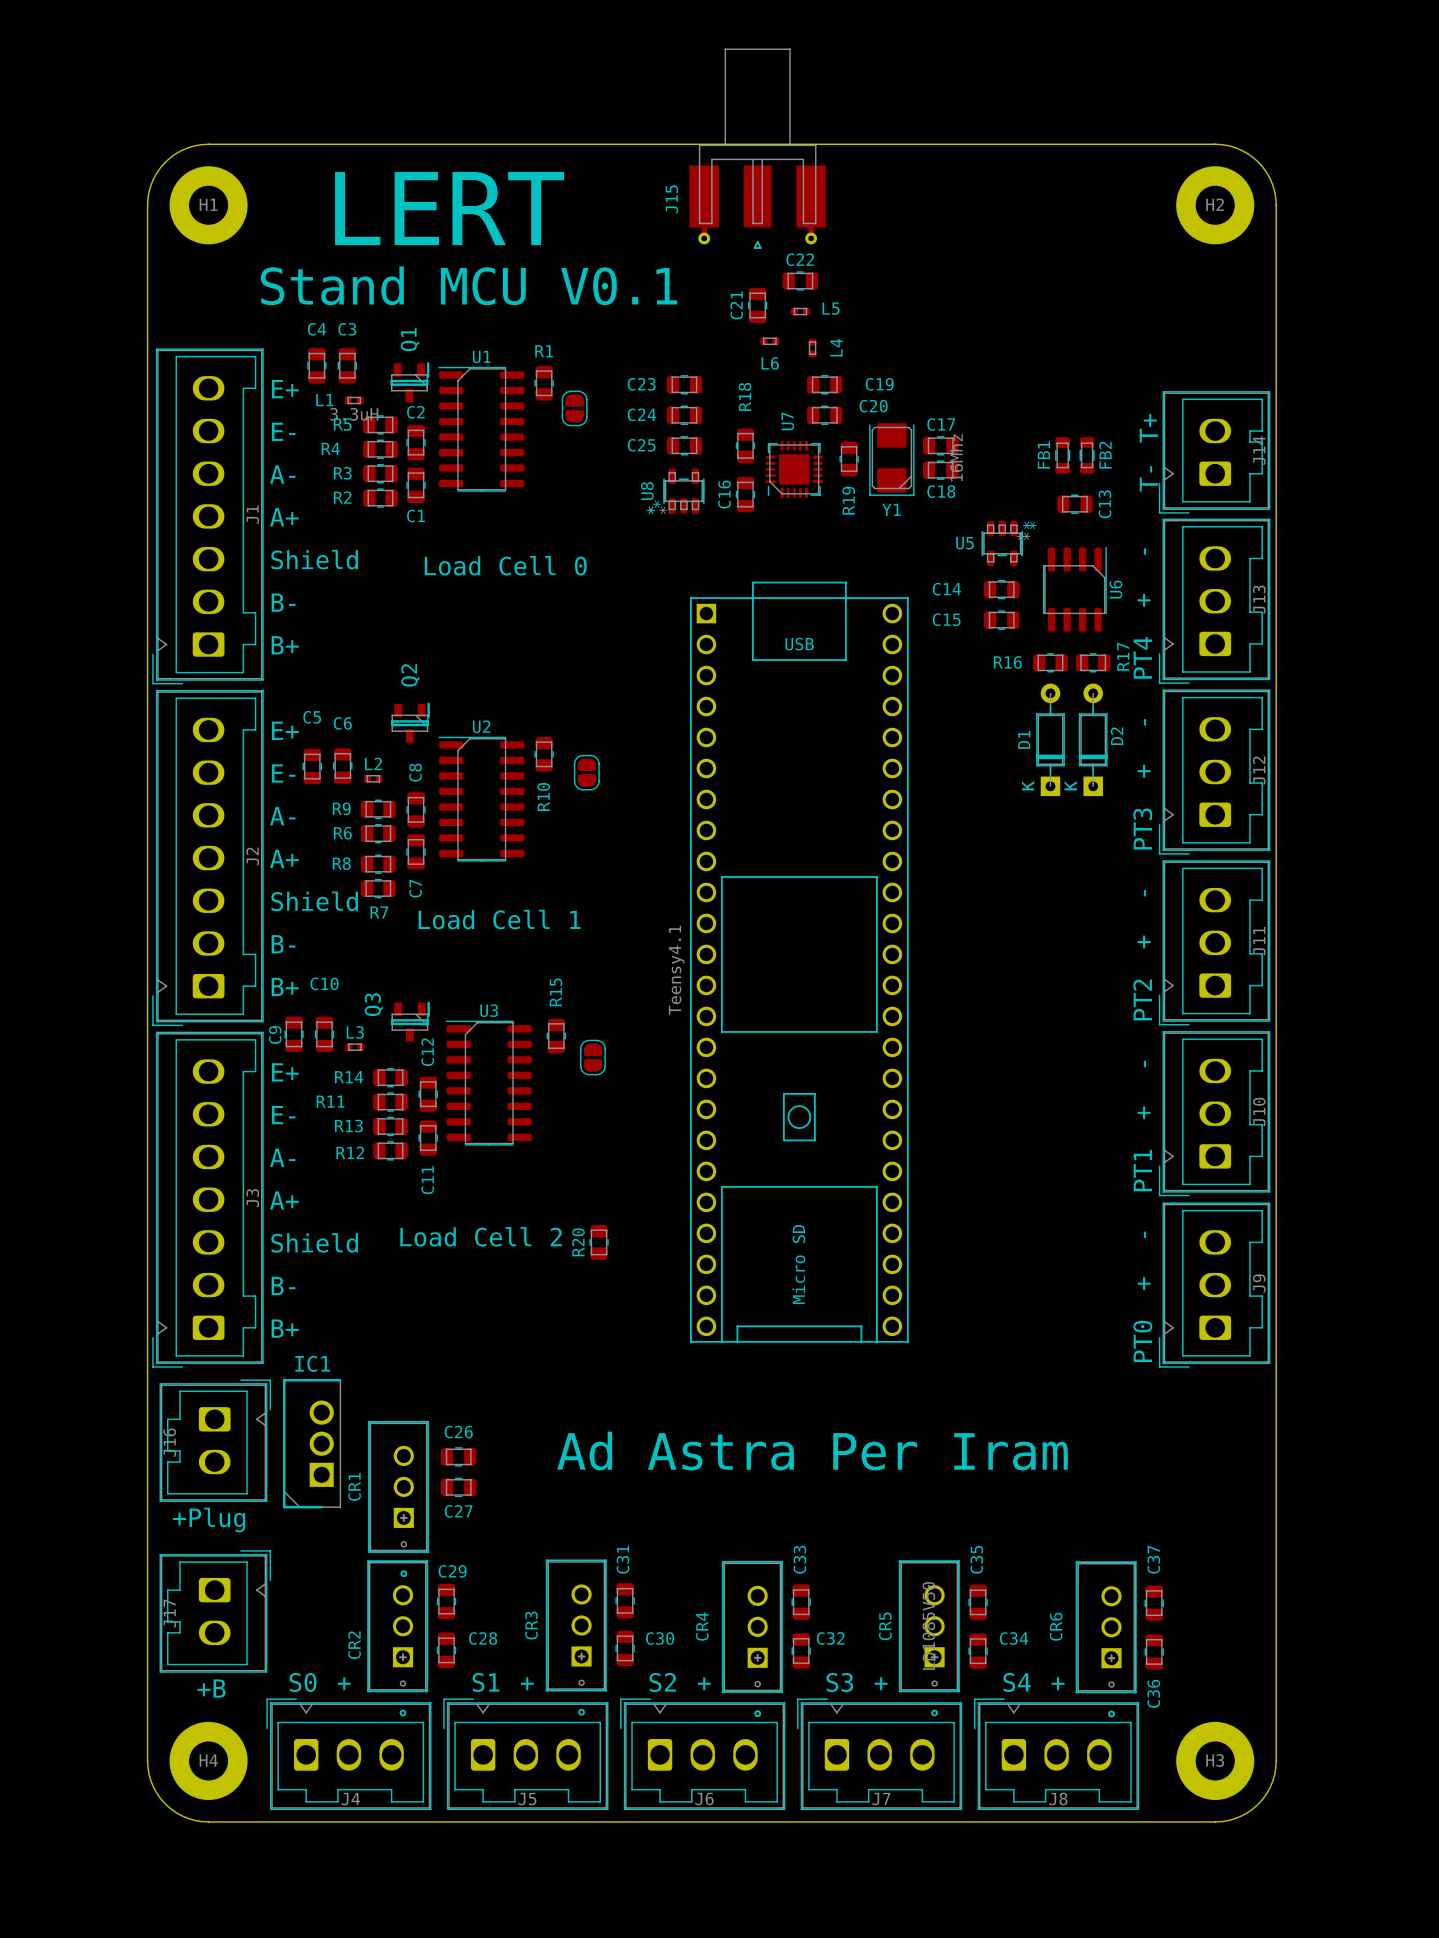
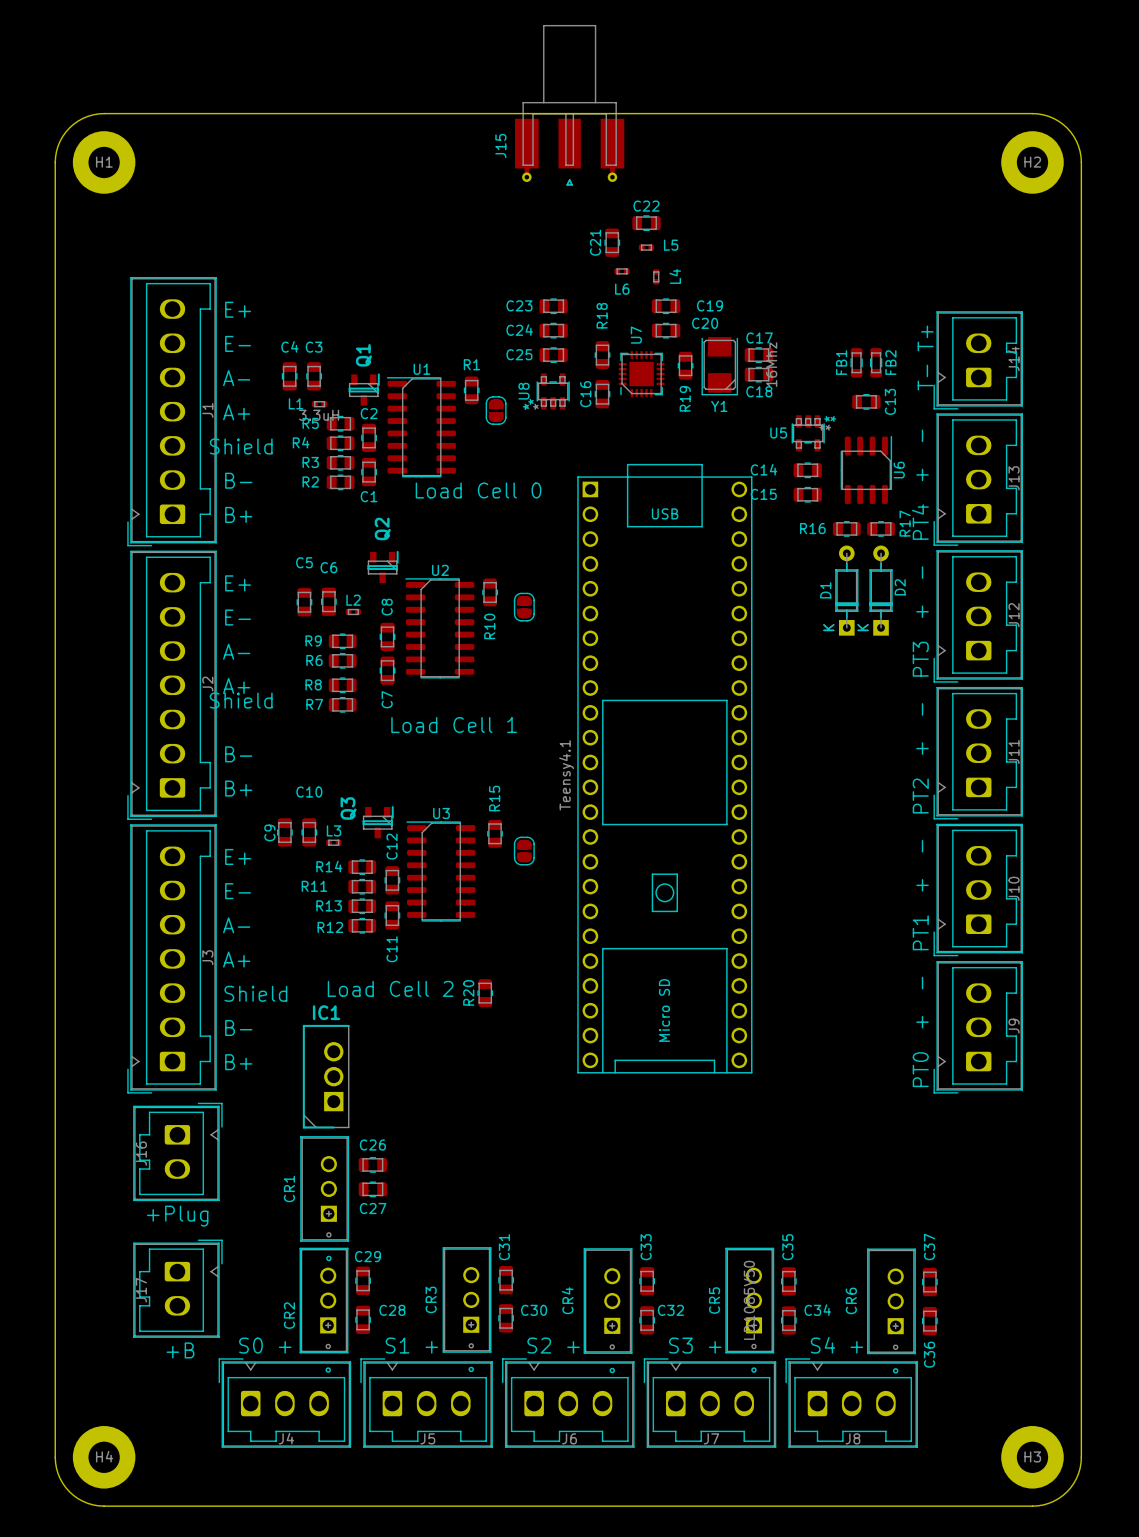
board edge: (208, 144) (195, 145) (182, 150) (165, 162) (156, 172) (151, 185) (147, 205) (147, 1760) (149, 1774) (153, 1787) (165, 1804) (182, 1815) (195, 1820) (208, 1821) (1215, 1821) (1228, 1820) (1241, 1815) (1253, 1808) (1266, 1793) (1272, 1781) (1276, 1760) (1276, 205) (1274, 191) (1270, 178) (1258, 162) (1247, 153) (1235, 147) (1215, 144) -> (172, 113) (104, 113) (82, 118) (73, 124) (62, 136) (58, 146) (55, 162) (55, 1457) (58, 1473) (69, 1491) (87, 1503) (104, 1506) (1032, 1506) (1048, 1503) (1058, 1498) (1073, 1483) (1080, 1468) (1081, 1457) (1081, 157) (1078, 146) (1070, 132) (1053, 118) (1037, 113) (978, 113)
J15 position: (757, 148) -> (569, 105)
H1 position: (208, 205) -> (104, 162)
H2 position: (1215, 205) -> (1032, 162)
text: LERT (449, 208) -> none
text: Stand MCU V0.1 (468, 285) -> none
C4 position: (316, 365) -> (289, 376)
C3 position: (347, 365) -> (314, 376)
Q1 position: (409, 382) -> (364, 389)
R1 position: (544, 383) -> (471, 390)
L1 position: (354, 400) -> (319, 404)
part position: (574, 408) -> (496, 410)
R5 position: (380, 424) -> (340, 423)
U1 position: (481, 429) -> (421, 427)
C2 position: (416, 442) -> (369, 437)
R4 position: (380, 449) -> (340, 443)
R3 position: (380, 473) -> (340, 462)
C1 position: (416, 485) -> (369, 472)
R2 position: (380, 498) -> (340, 482)
text position: Shield (314, 559) -> Shield (241, 446)
text position: Load Cell 0 (505, 565) -> Load Cell 0 (478, 490)
Q2 position: (410, 722) -> (383, 567)
R10 position: (544, 754) -> (490, 592)
C6 position: (342, 765) -> (328, 601)
C5 position: (312, 766) -> (304, 602)
part position: (586, 772) -> (524, 607)
L2 position: (373, 778) -> (353, 611)
U2 position: (481, 799) -> (439, 628)
R9 position: (378, 809) -> (342, 641)
C8 position: (416, 809) -> (387, 636)
R6 position: (378, 833) -> (342, 660)
C7 position: (416, 851) -> (387, 670)
R8 position: (378, 864) -> (342, 685)
R7 position: (378, 888) -> (342, 704)
text position: Shield (314, 901) -> Shield (241, 700)
R7 name position: R7 (379, 912) -> R7 (314, 704)
text position: Load Cell 1 (499, 919) -> Load Cell 1 (454, 725)
part position: (799, 962) -> (664, 768)
Q3 position: (410, 1021) -> (378, 822)
C9 position: (294, 1034) -> (284, 832)
C10 position: (324, 1034) -> (309, 832)
R15 position: (556, 1036) -> (495, 833)
L3 position: (355, 1047) -> (333, 842)
part position: (592, 1057) -> (524, 851)
R14 position: (390, 1077) -> (362, 867)
U3 position: (488, 1083) -> (440, 871)
C12 position: (428, 1094) -> (392, 880)
R11 position: (390, 1102) -> (362, 886)
R13 position: (390, 1126) -> (362, 906)
C11 position: (428, 1138) -> (392, 915)
R12 position: (390, 1150) -> (362, 925)
IC1 position: (312, 1443) -> (326, 1076)
text: Ad Astra Per Iram (812, 1451) -> none
H4 position: (208, 1760) -> (104, 1457)
H3 position: (1215, 1760) -> (1032, 1457)

